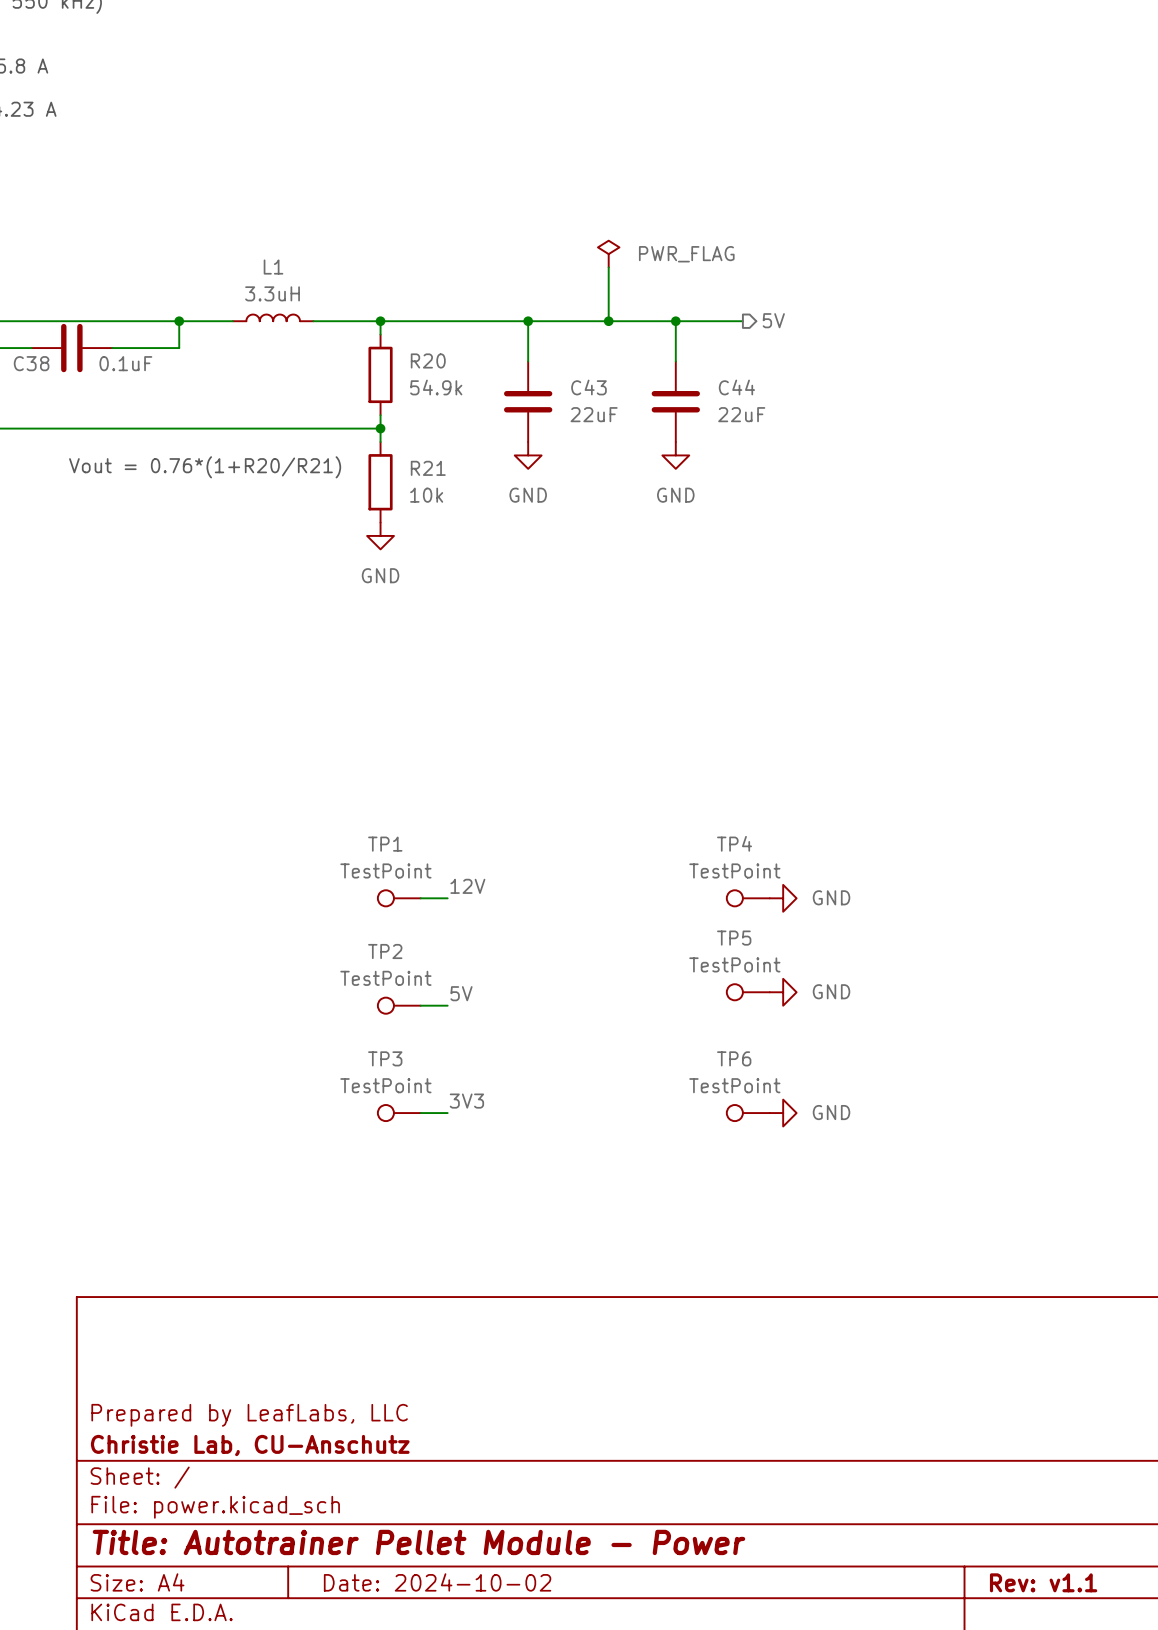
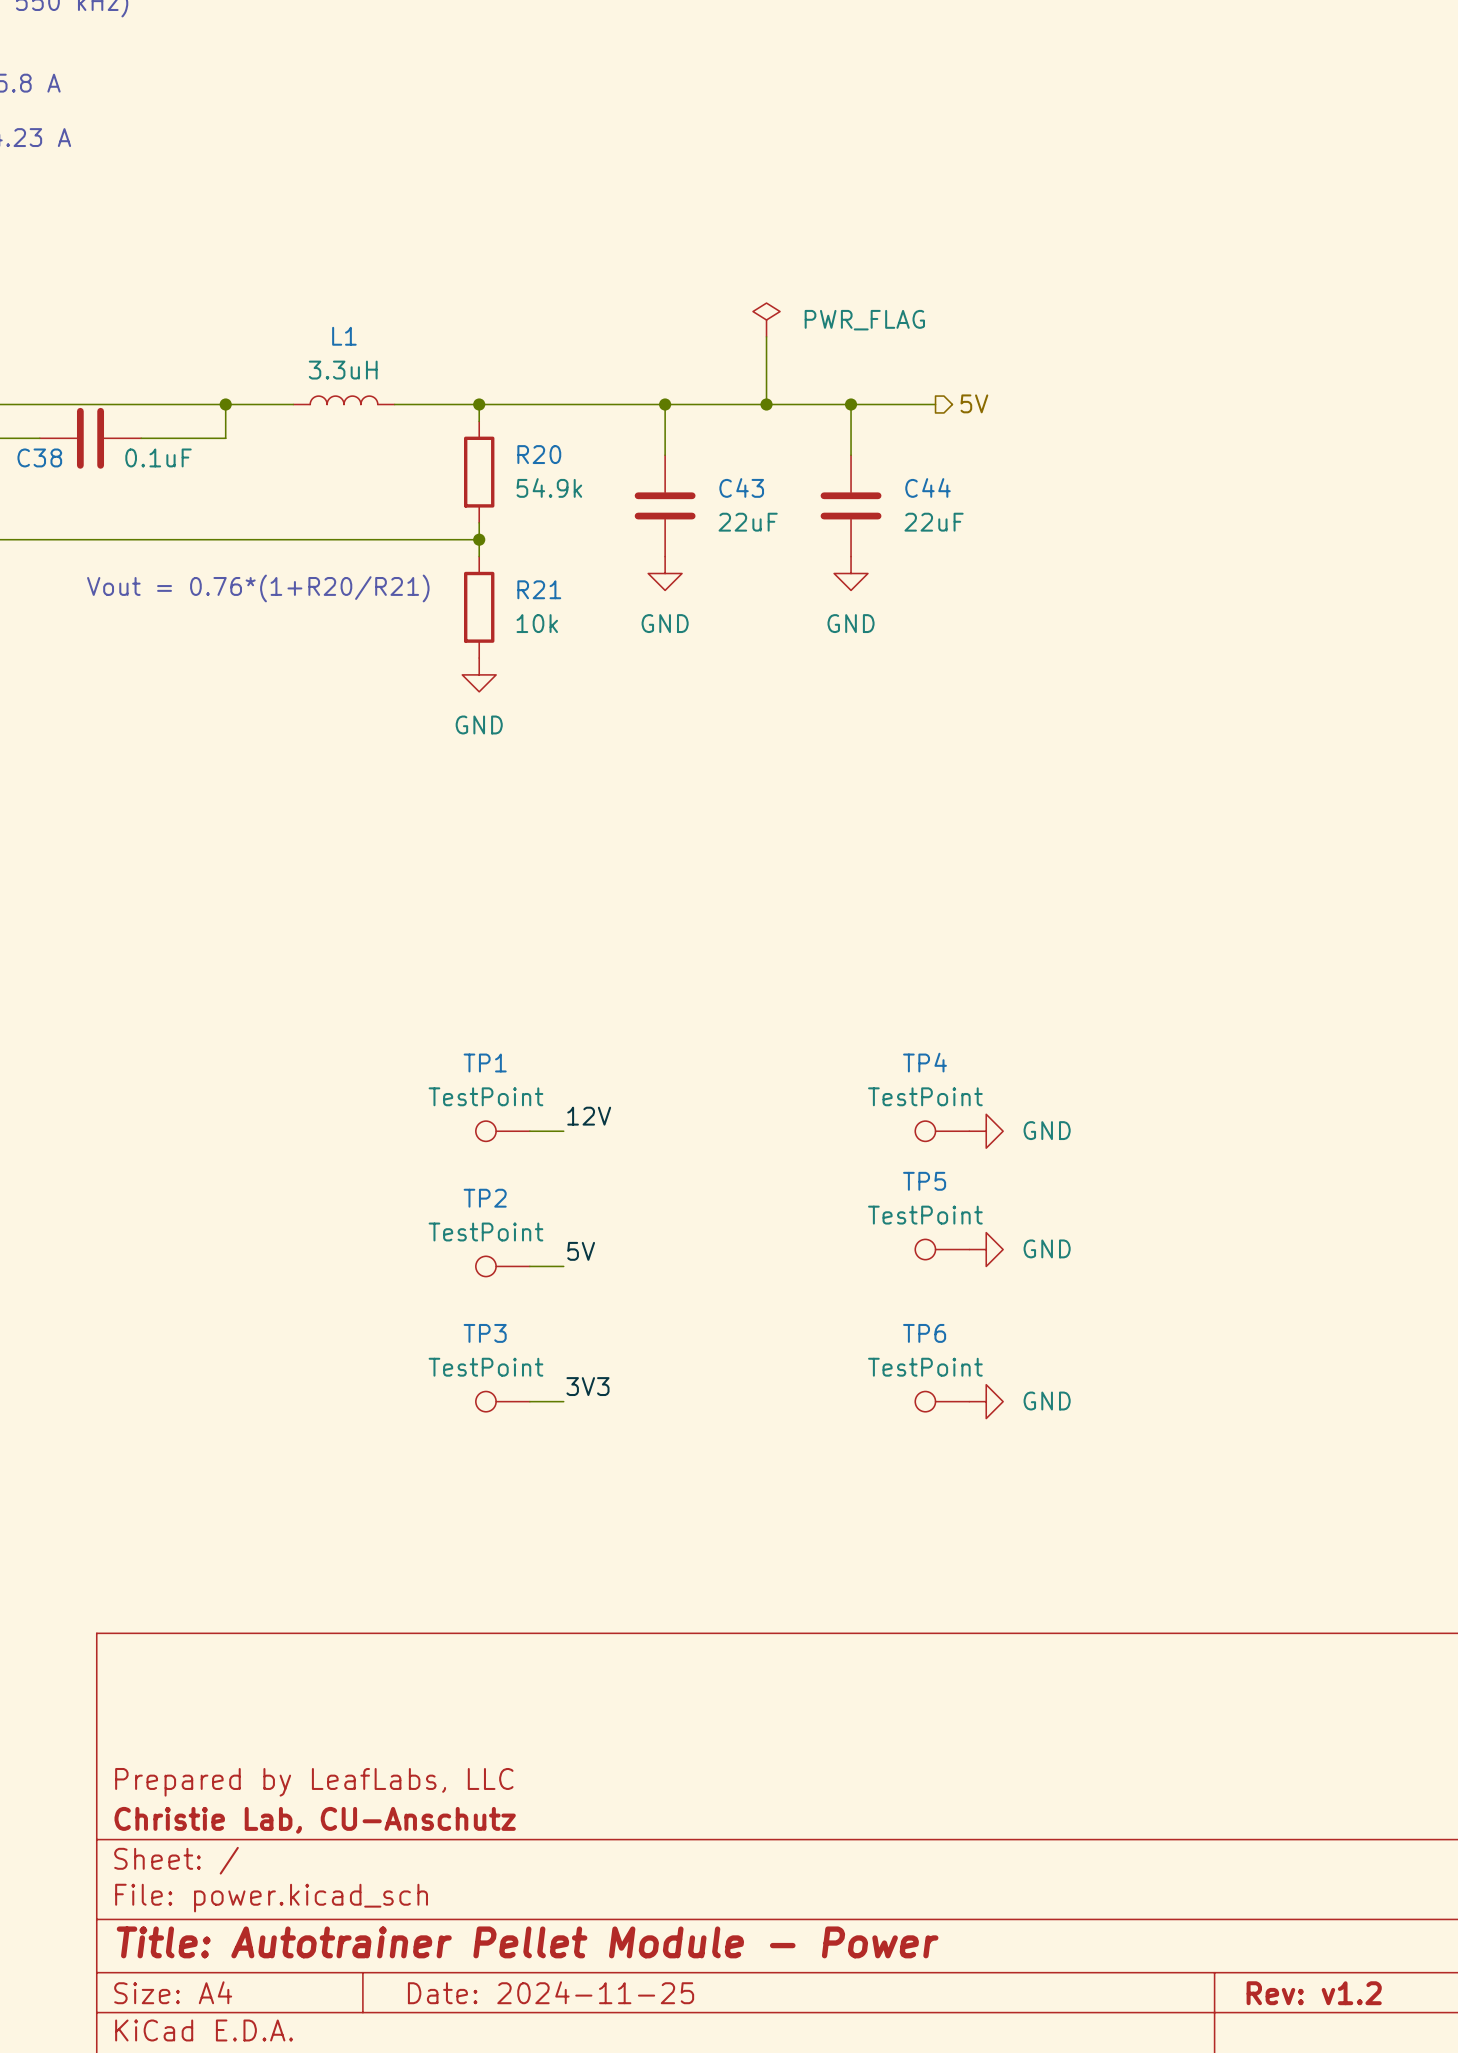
title block: Date: 2024-10-02 (437, 1582) -> Date: 2024-11-25 (551, 1992)
title block: Rev: v1.1 (1043, 1582) -> Rev: v1.2 (1314, 1993)

